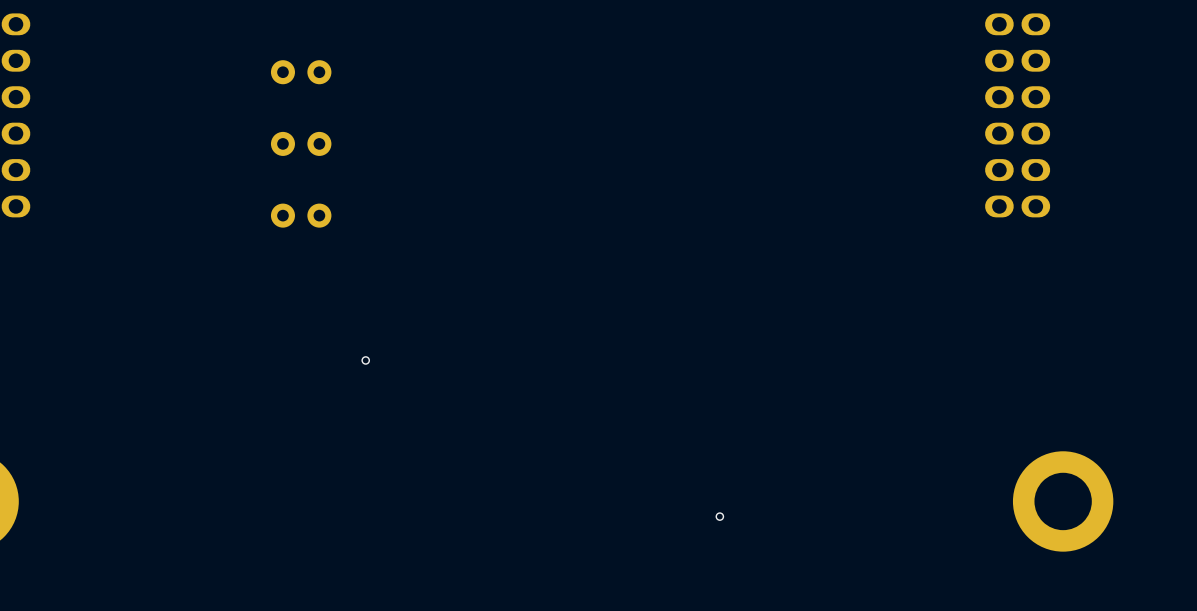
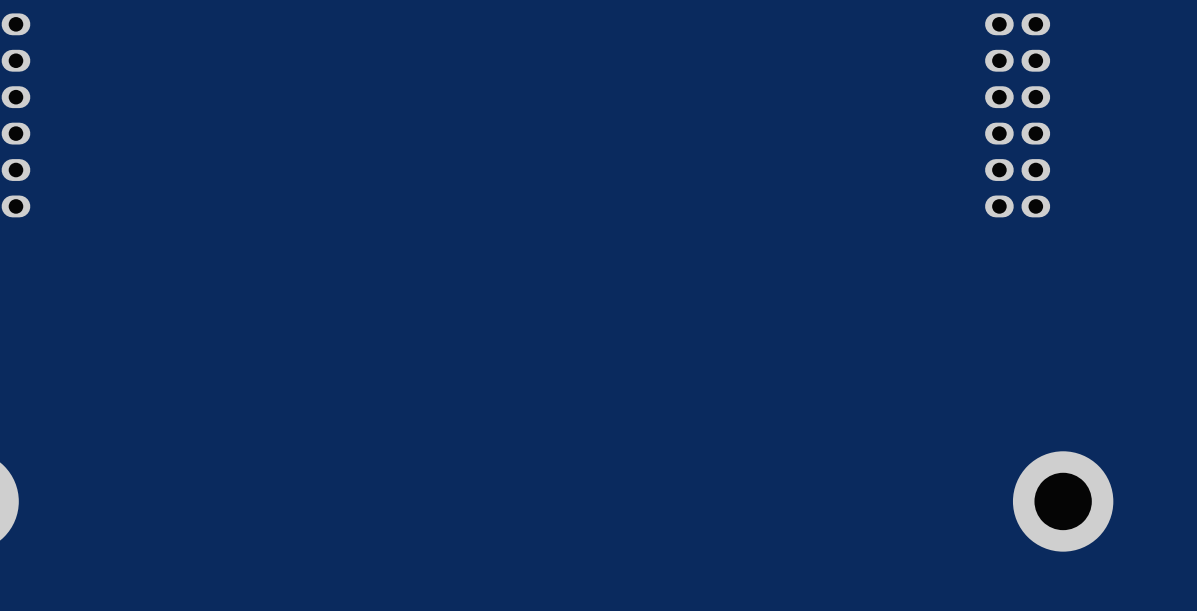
part: (301, 72) -> none
part: (301, 143) -> none
part: (301, 215) -> none
via: (365, 360) -> none
via: (719, 516) -> none

